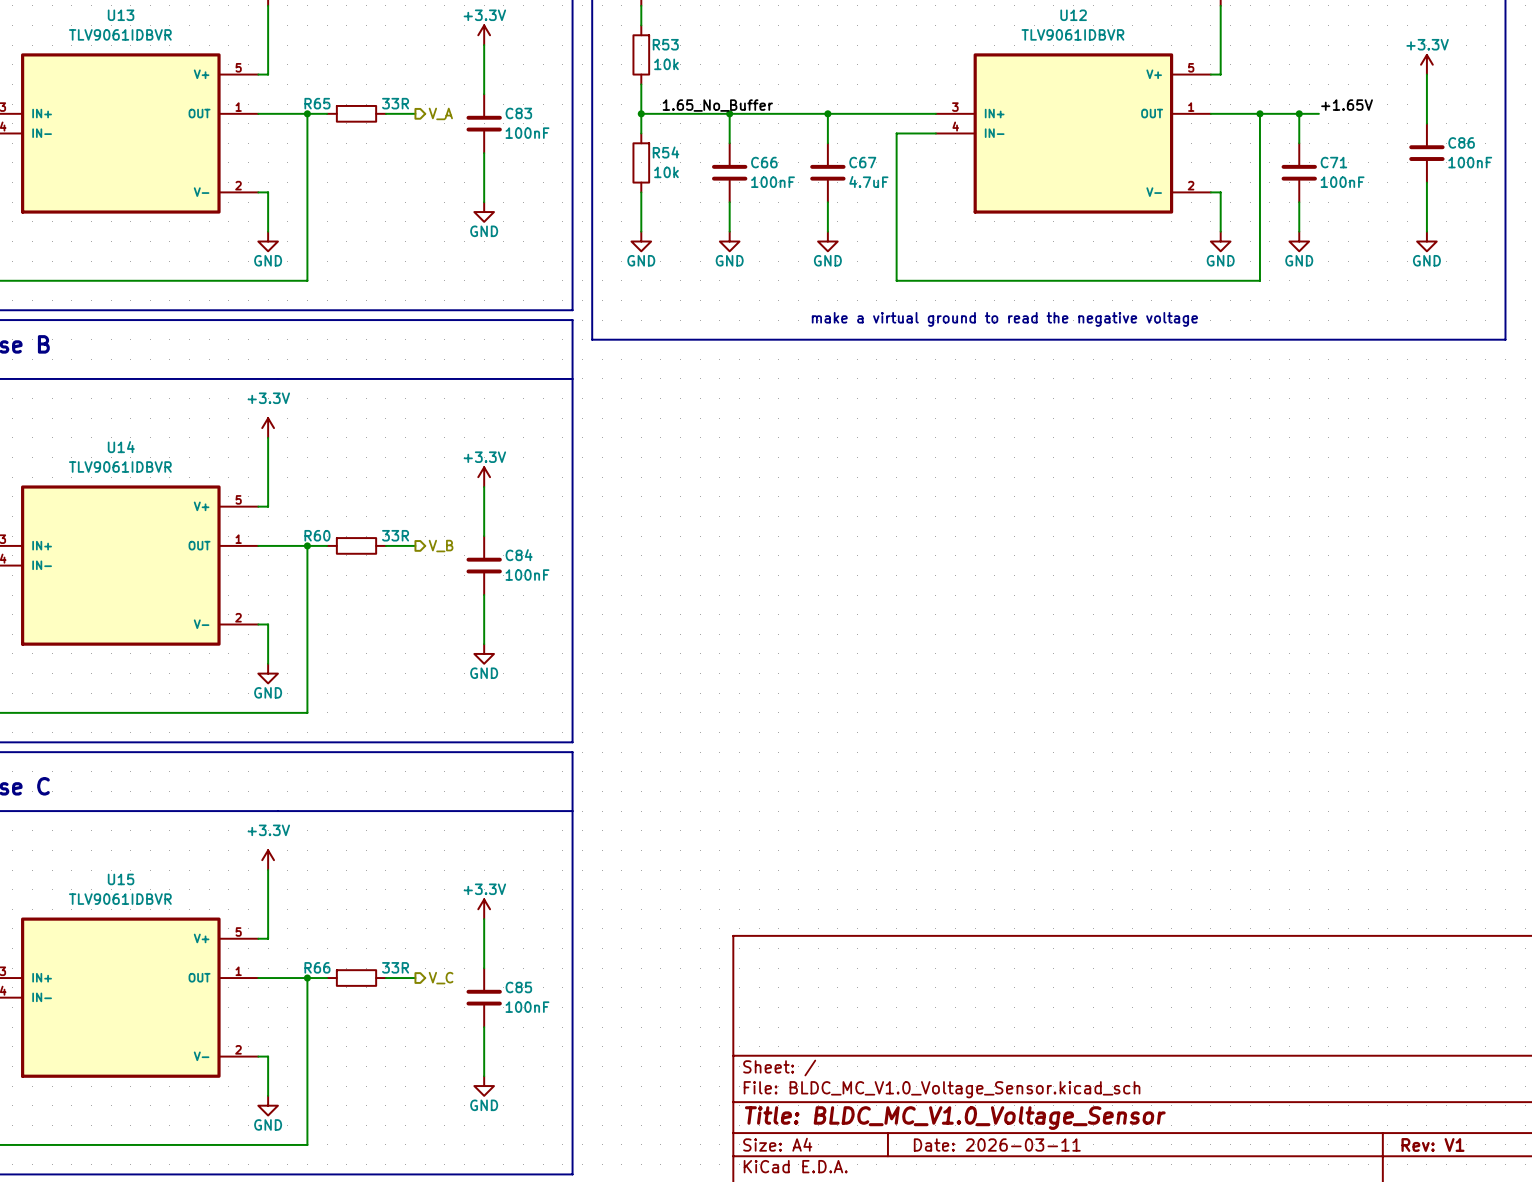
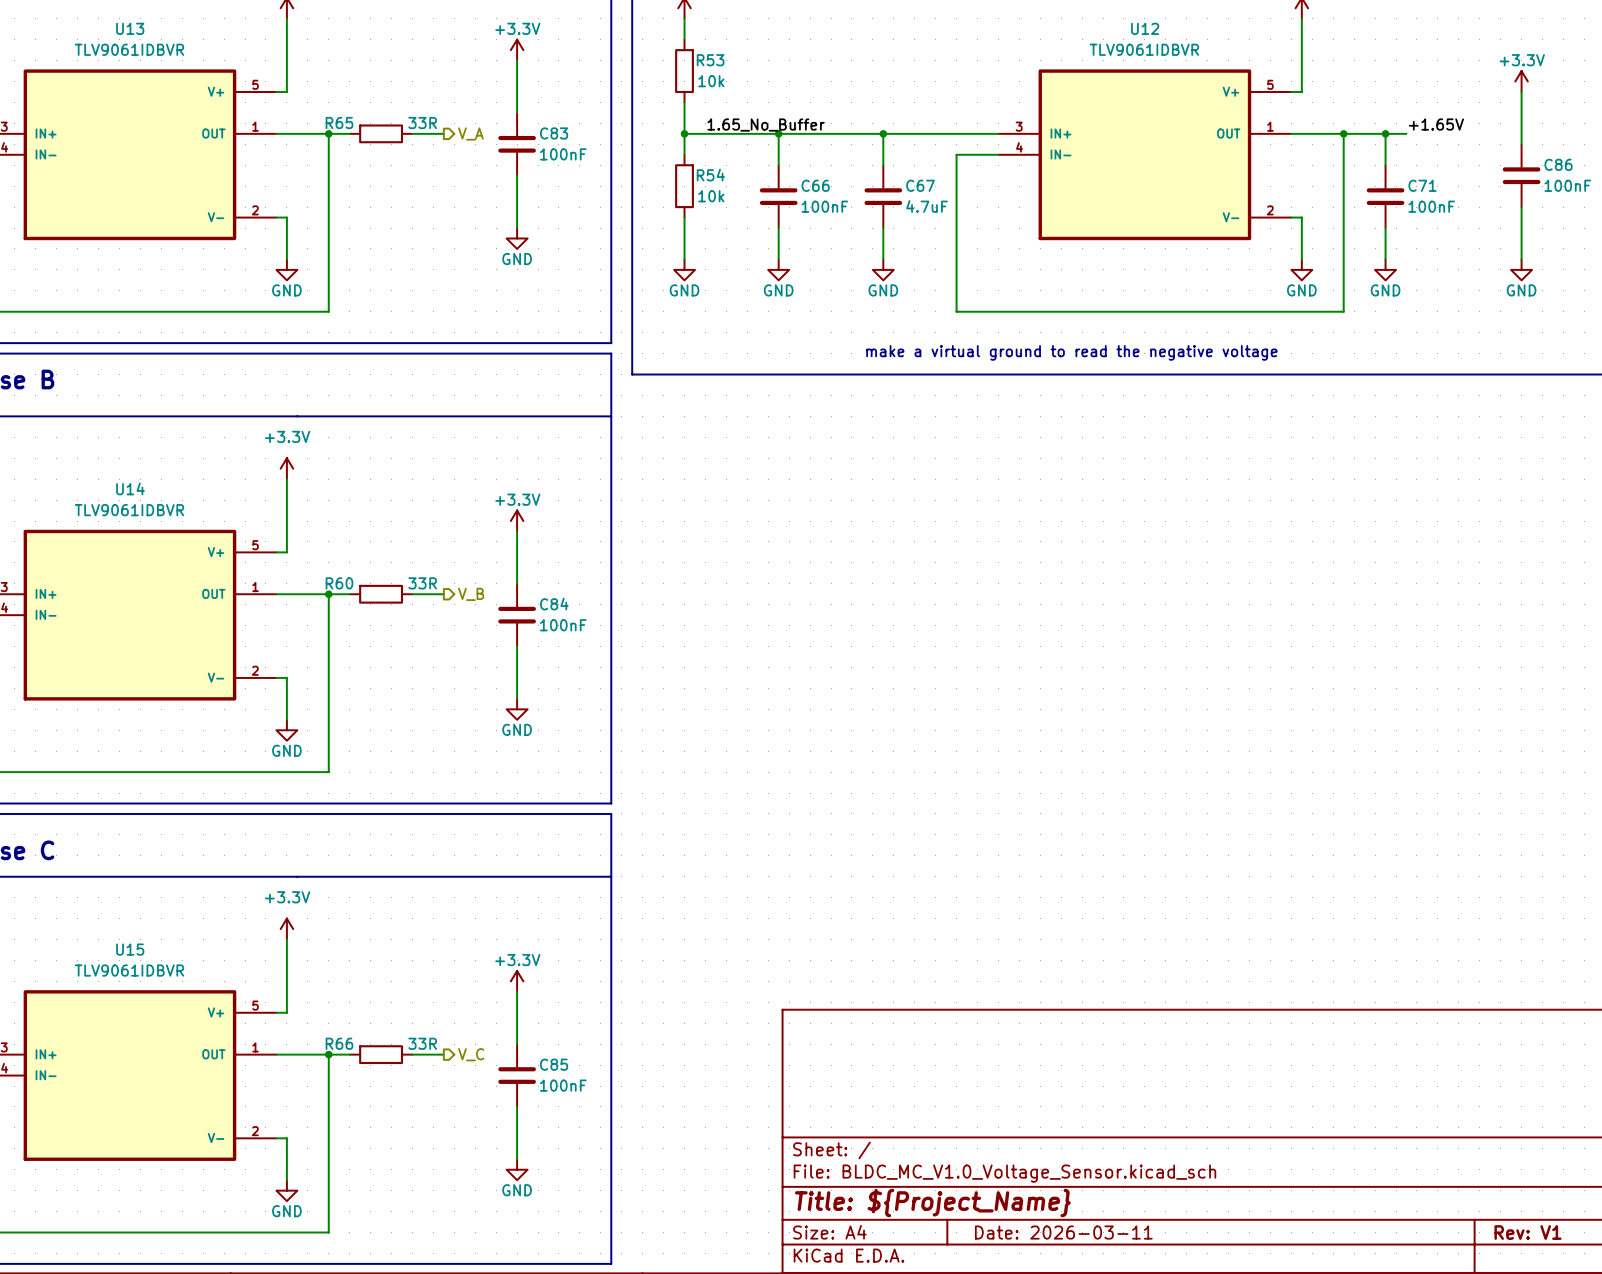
title block: Title: BLDC_MC_V1.0_Voltage_Sensor (955, 1118) -> Title: ${Project_Name} (932, 1203)

